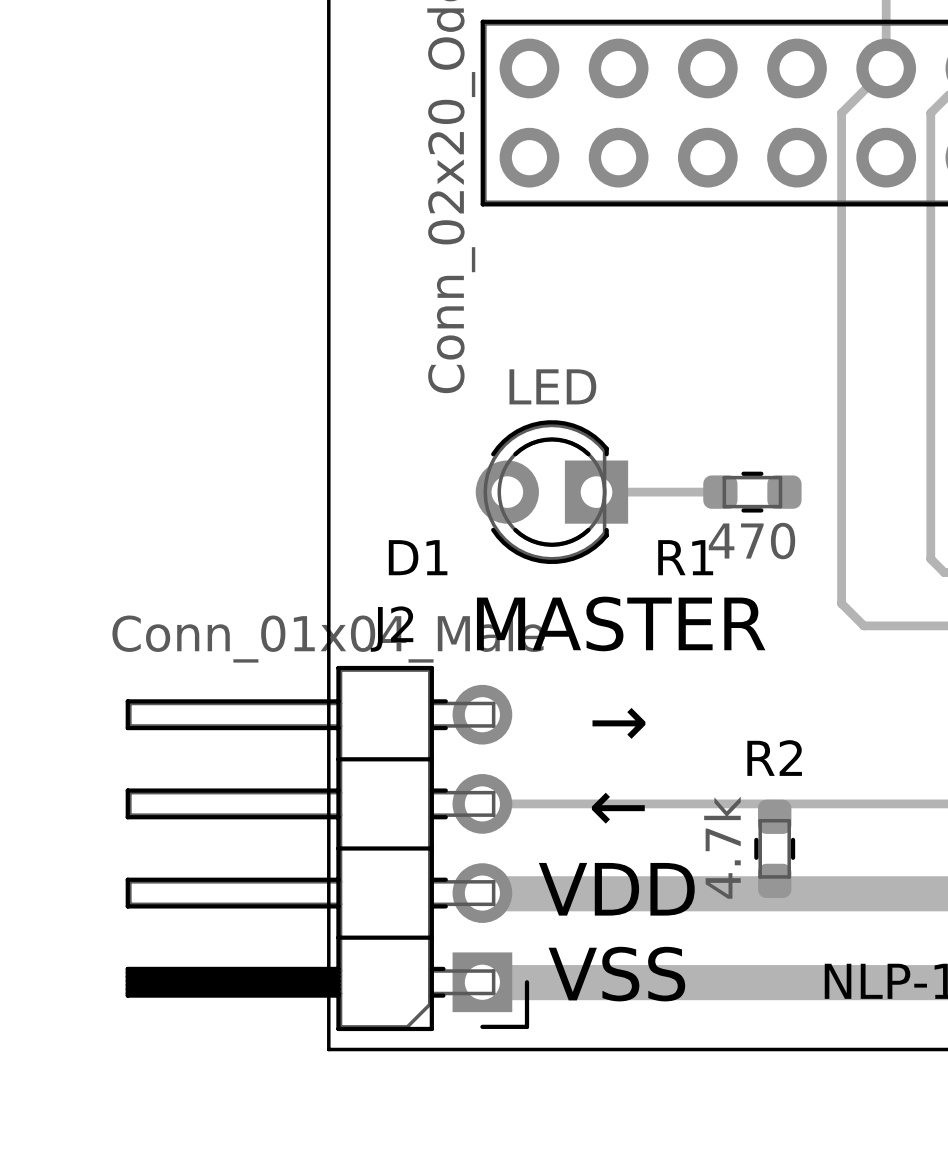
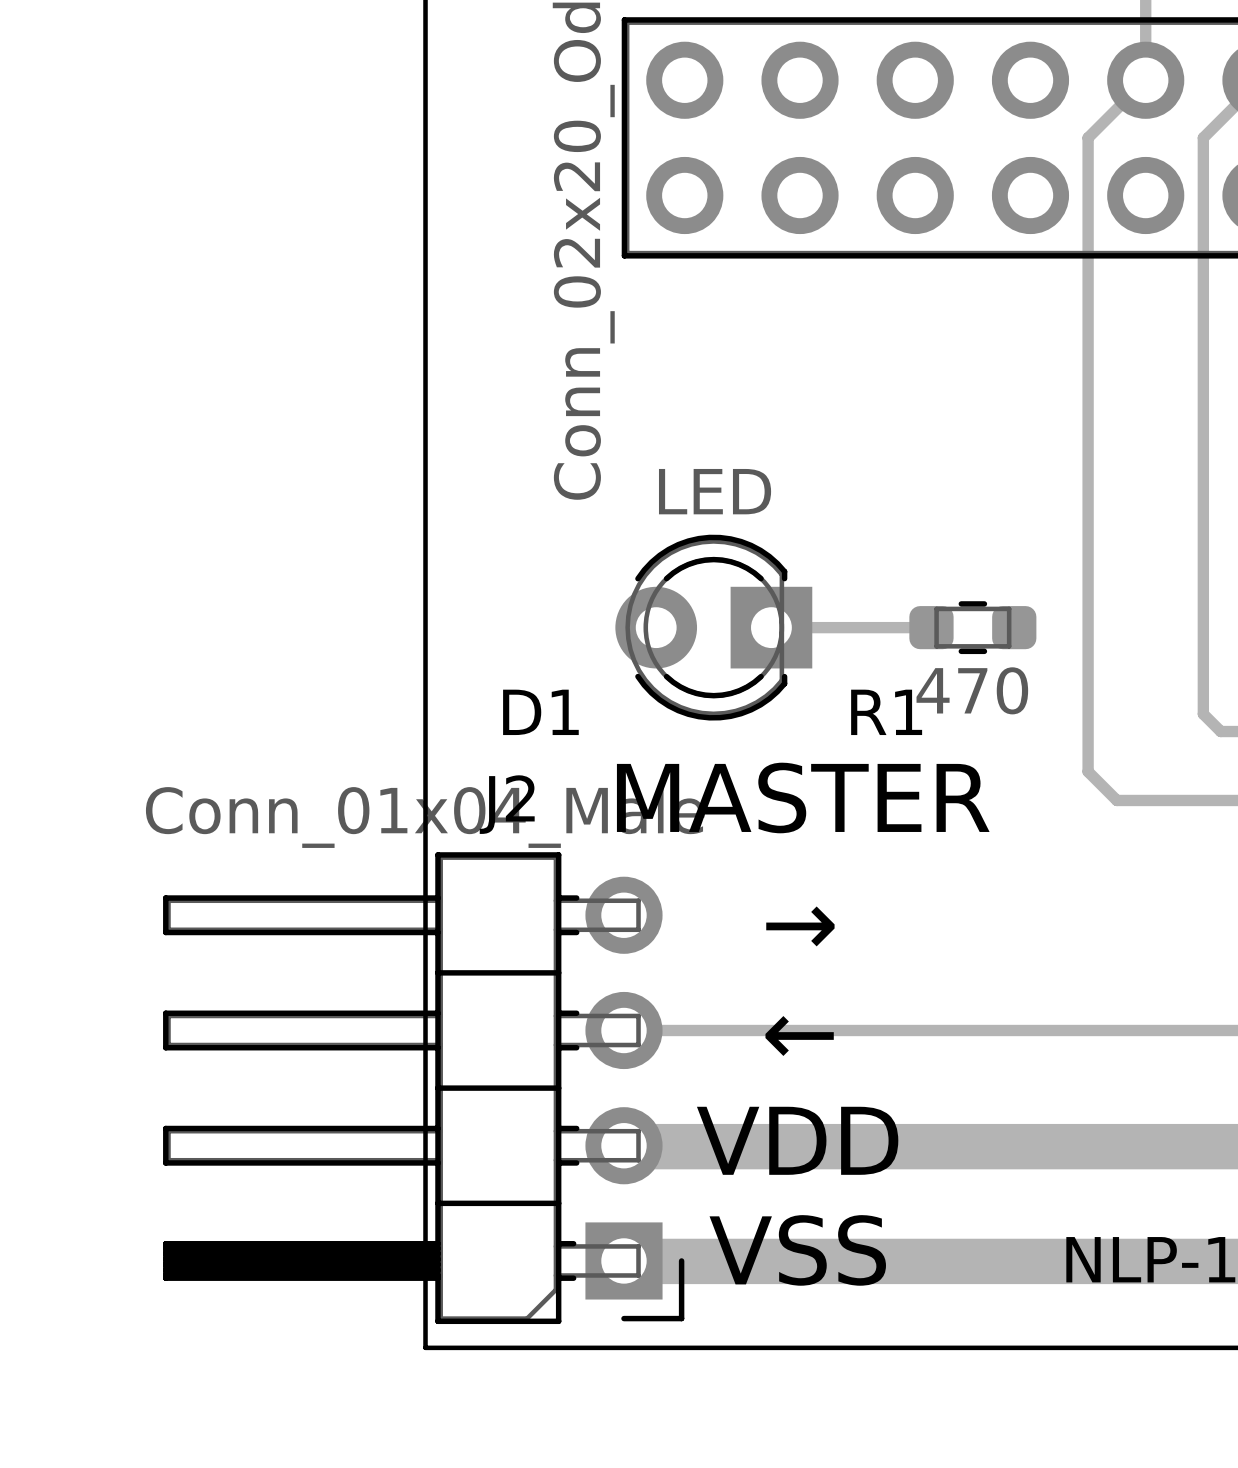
R2: 4.7k (774, 848) -> none

